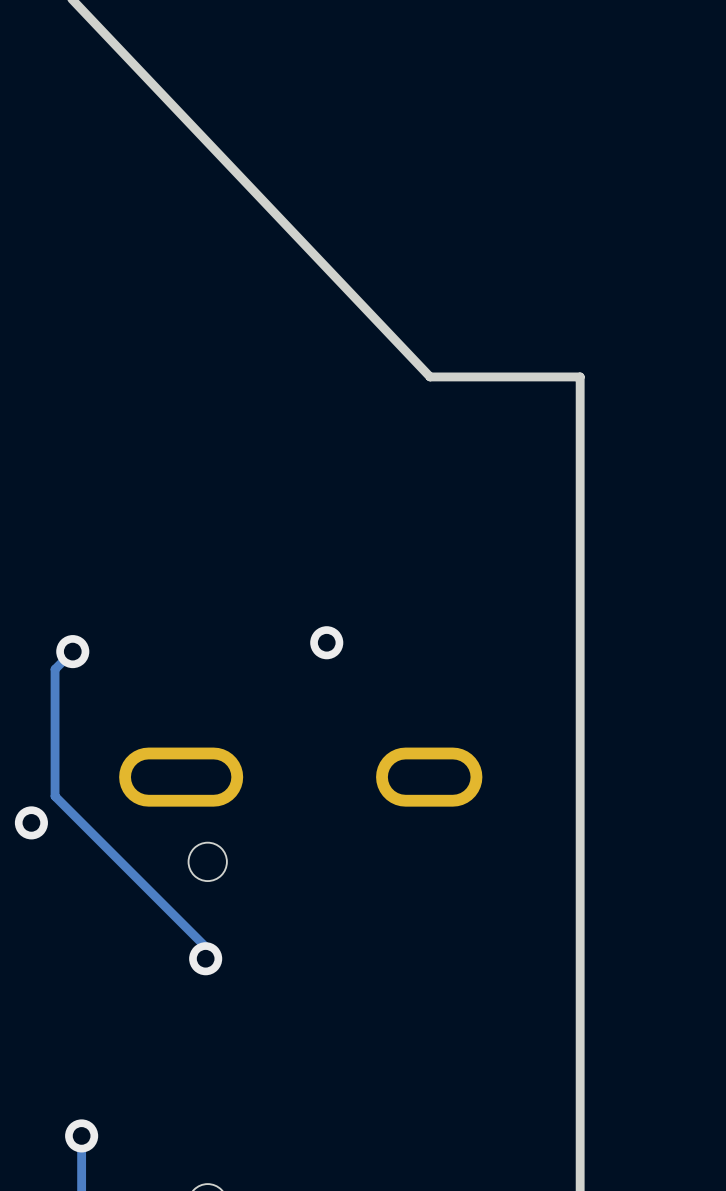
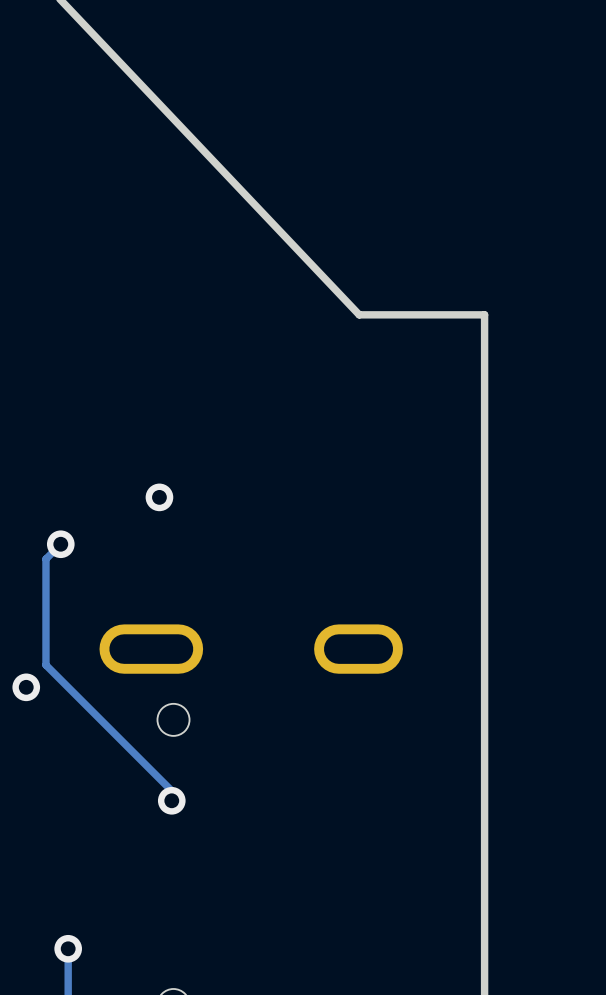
via position: (326, 642) -> (159, 497)

